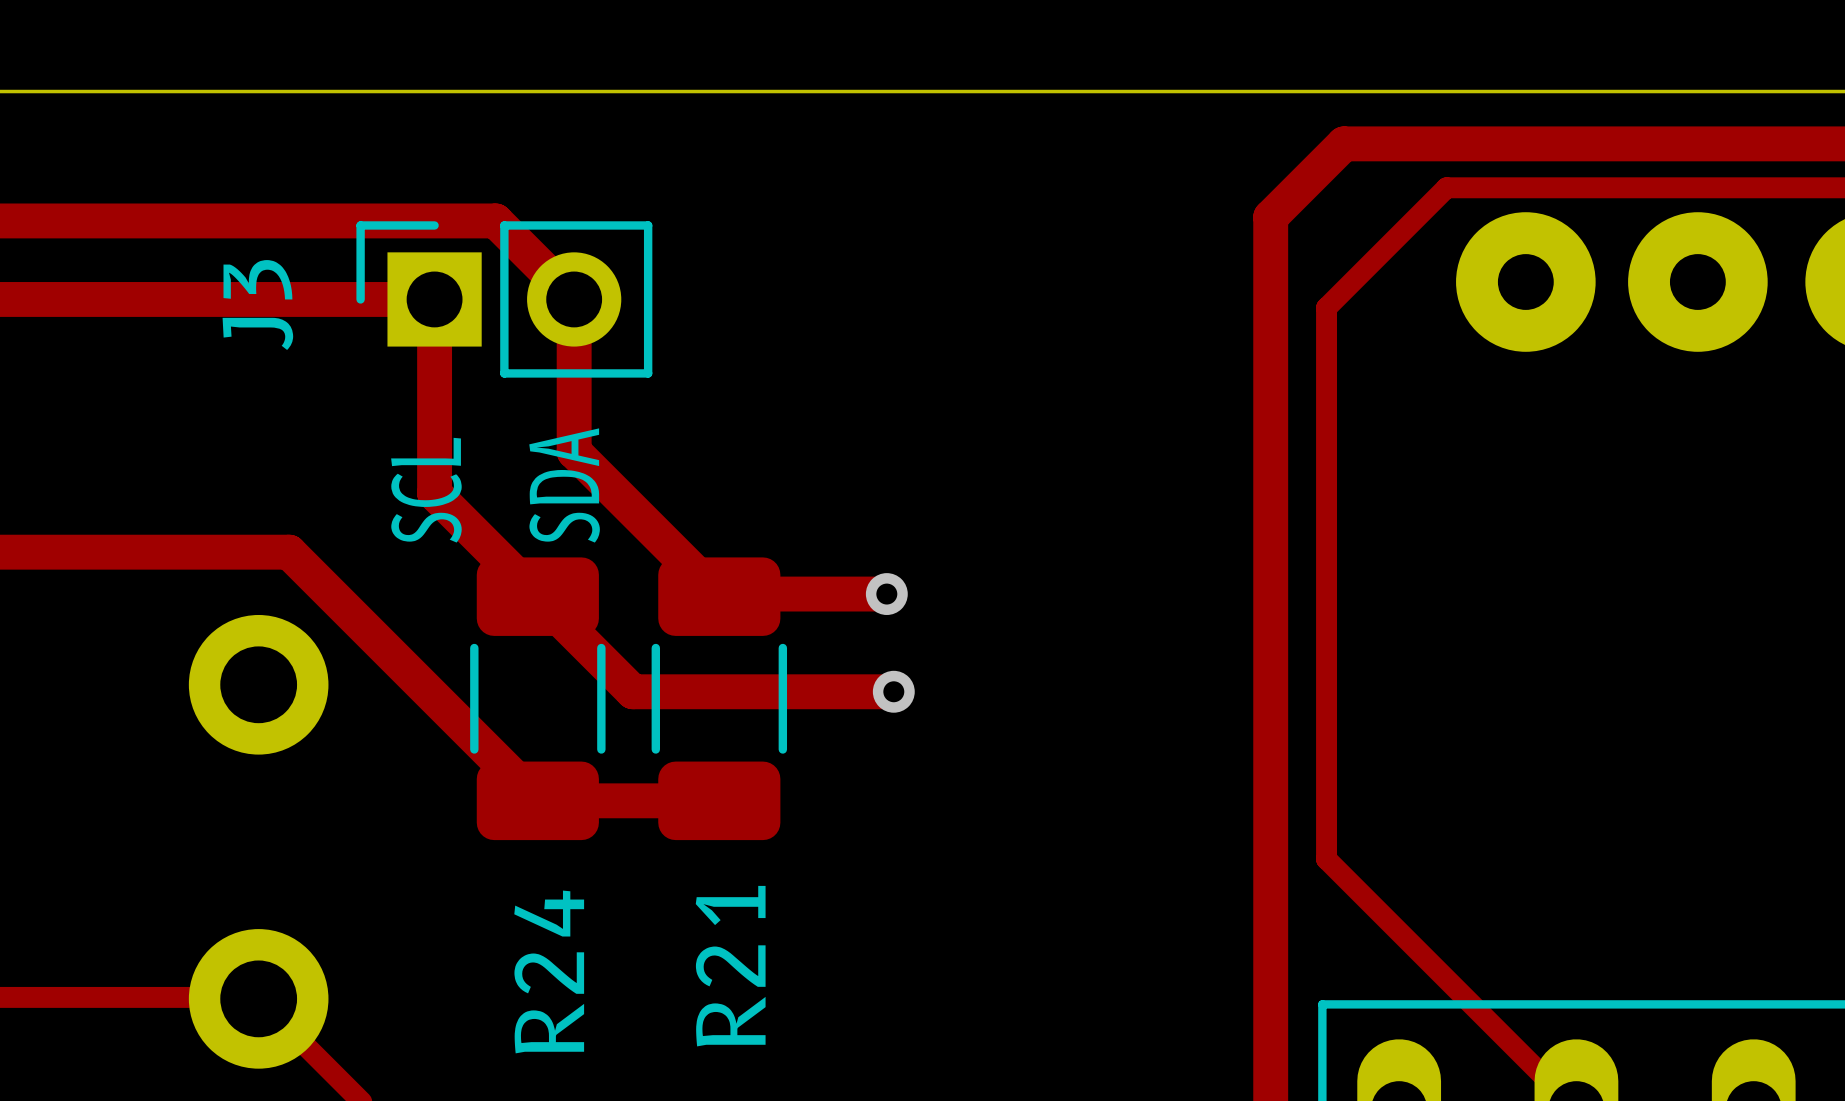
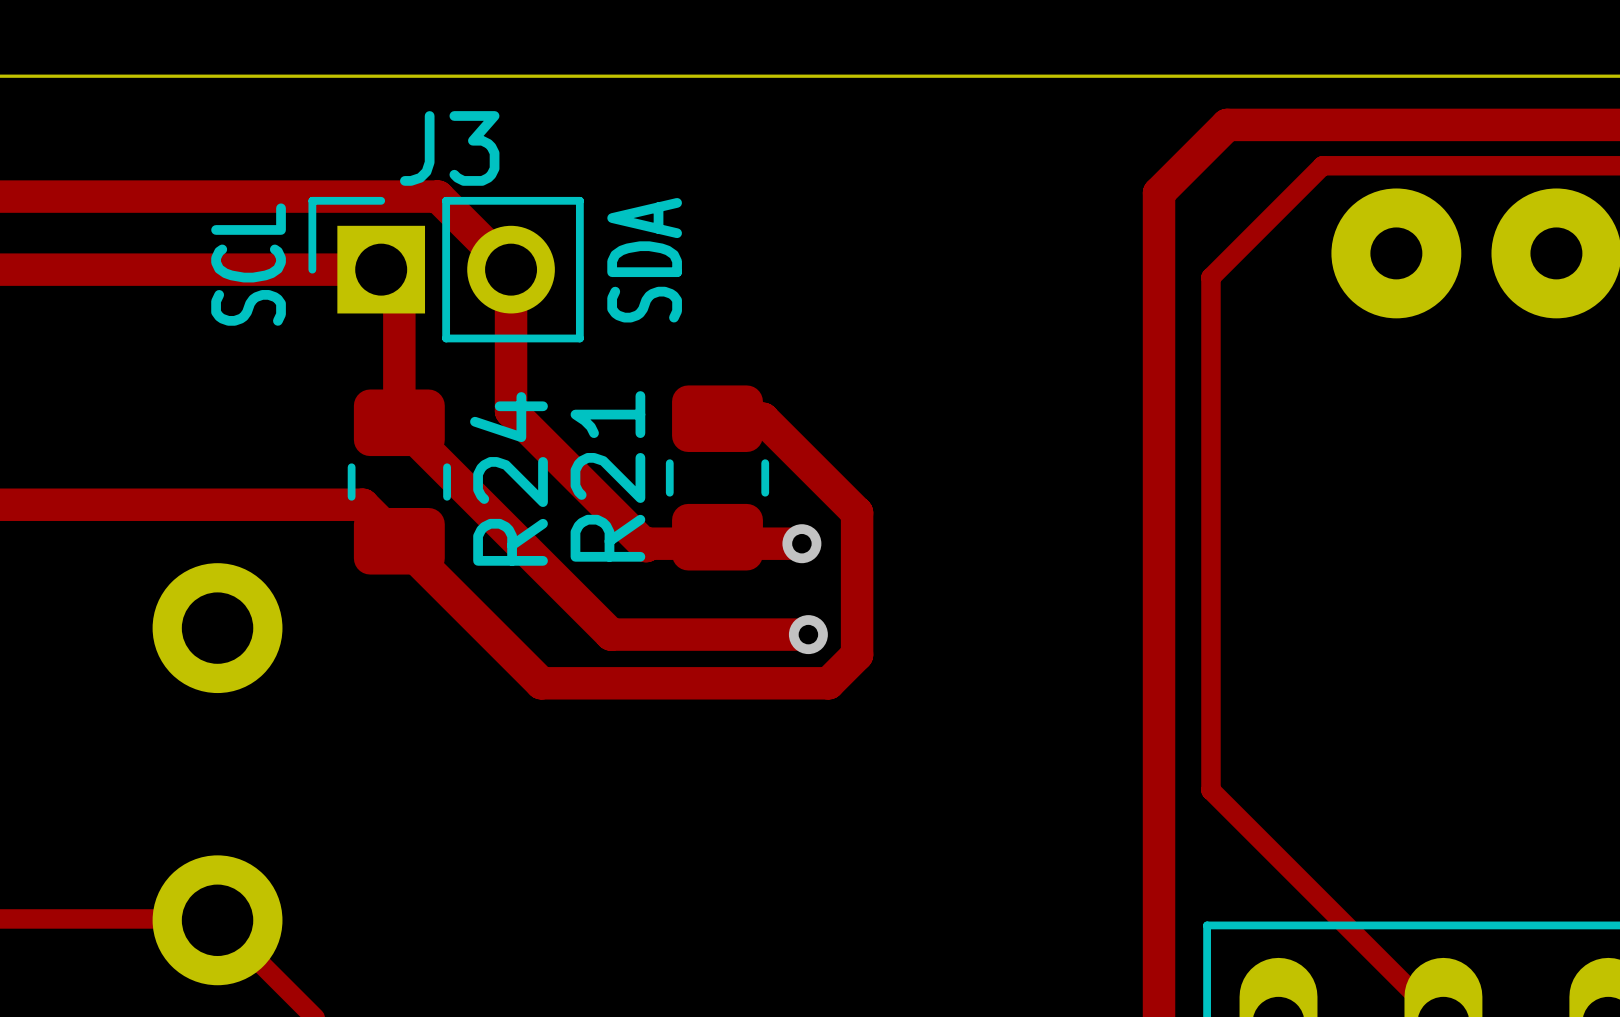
track: (434, 299) (434, 493) (632, 691) (681, 691) -> (381, 269) (399, 287) (399, 422) (611, 634)
J3 name rotation: 0° (257, 305) -> 90° clockwise (449, 148)
J3 name position: J3 (257, 305) -> J3 (449, 148)
text position: SDA (564, 485) -> SDA (644, 260)
text position: SCL (426, 490) -> SCL (248, 264)
track: (289, 552) (537, 800) (719, 800) -> (245, 504) (362, 504) (541, 683) (828, 683) (857, 654) (857, 512) (762, 418) (717, 418)
R24 footprint: [470, 557, 606, 841] -> [347, 389, 451, 575]
R21 footprint: [651, 557, 788, 841] -> [665, 385, 770, 571]
R21 name position: R21 (730, 966) -> R21 (607, 476)
R24 name position: R24 (549, 971) -> R24 (508, 478)

